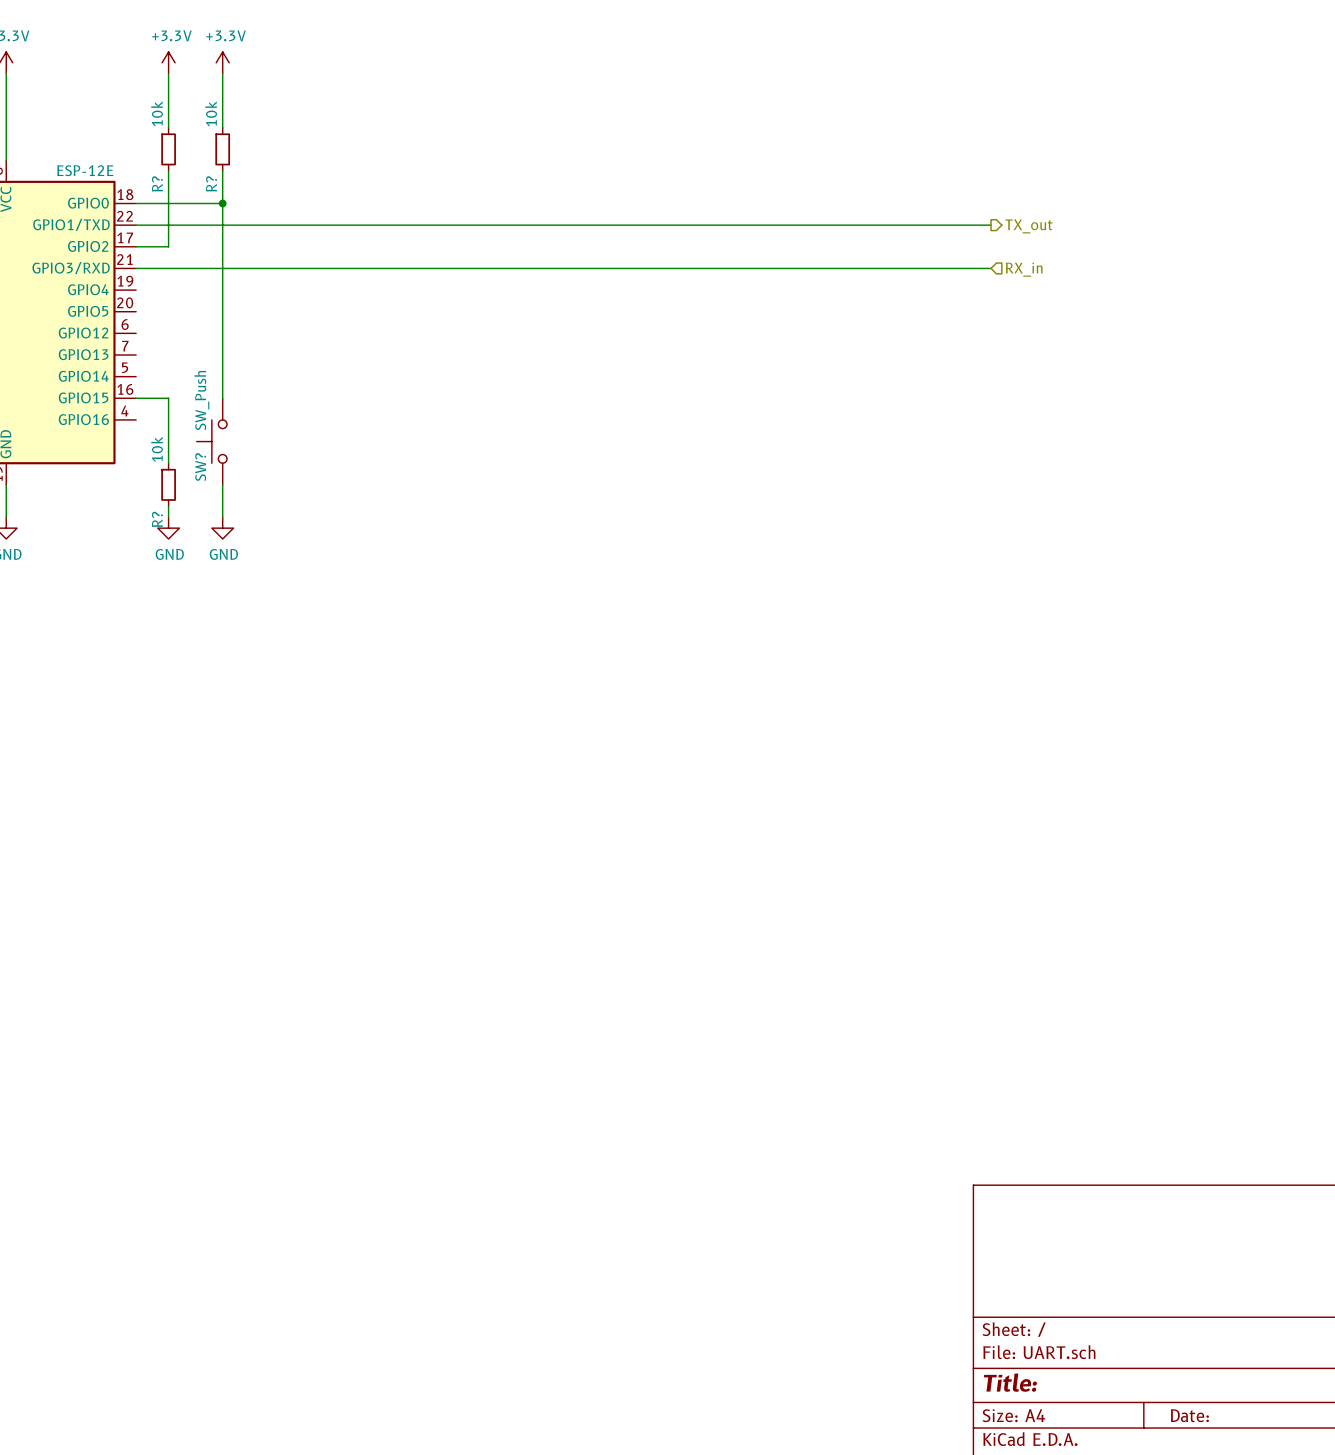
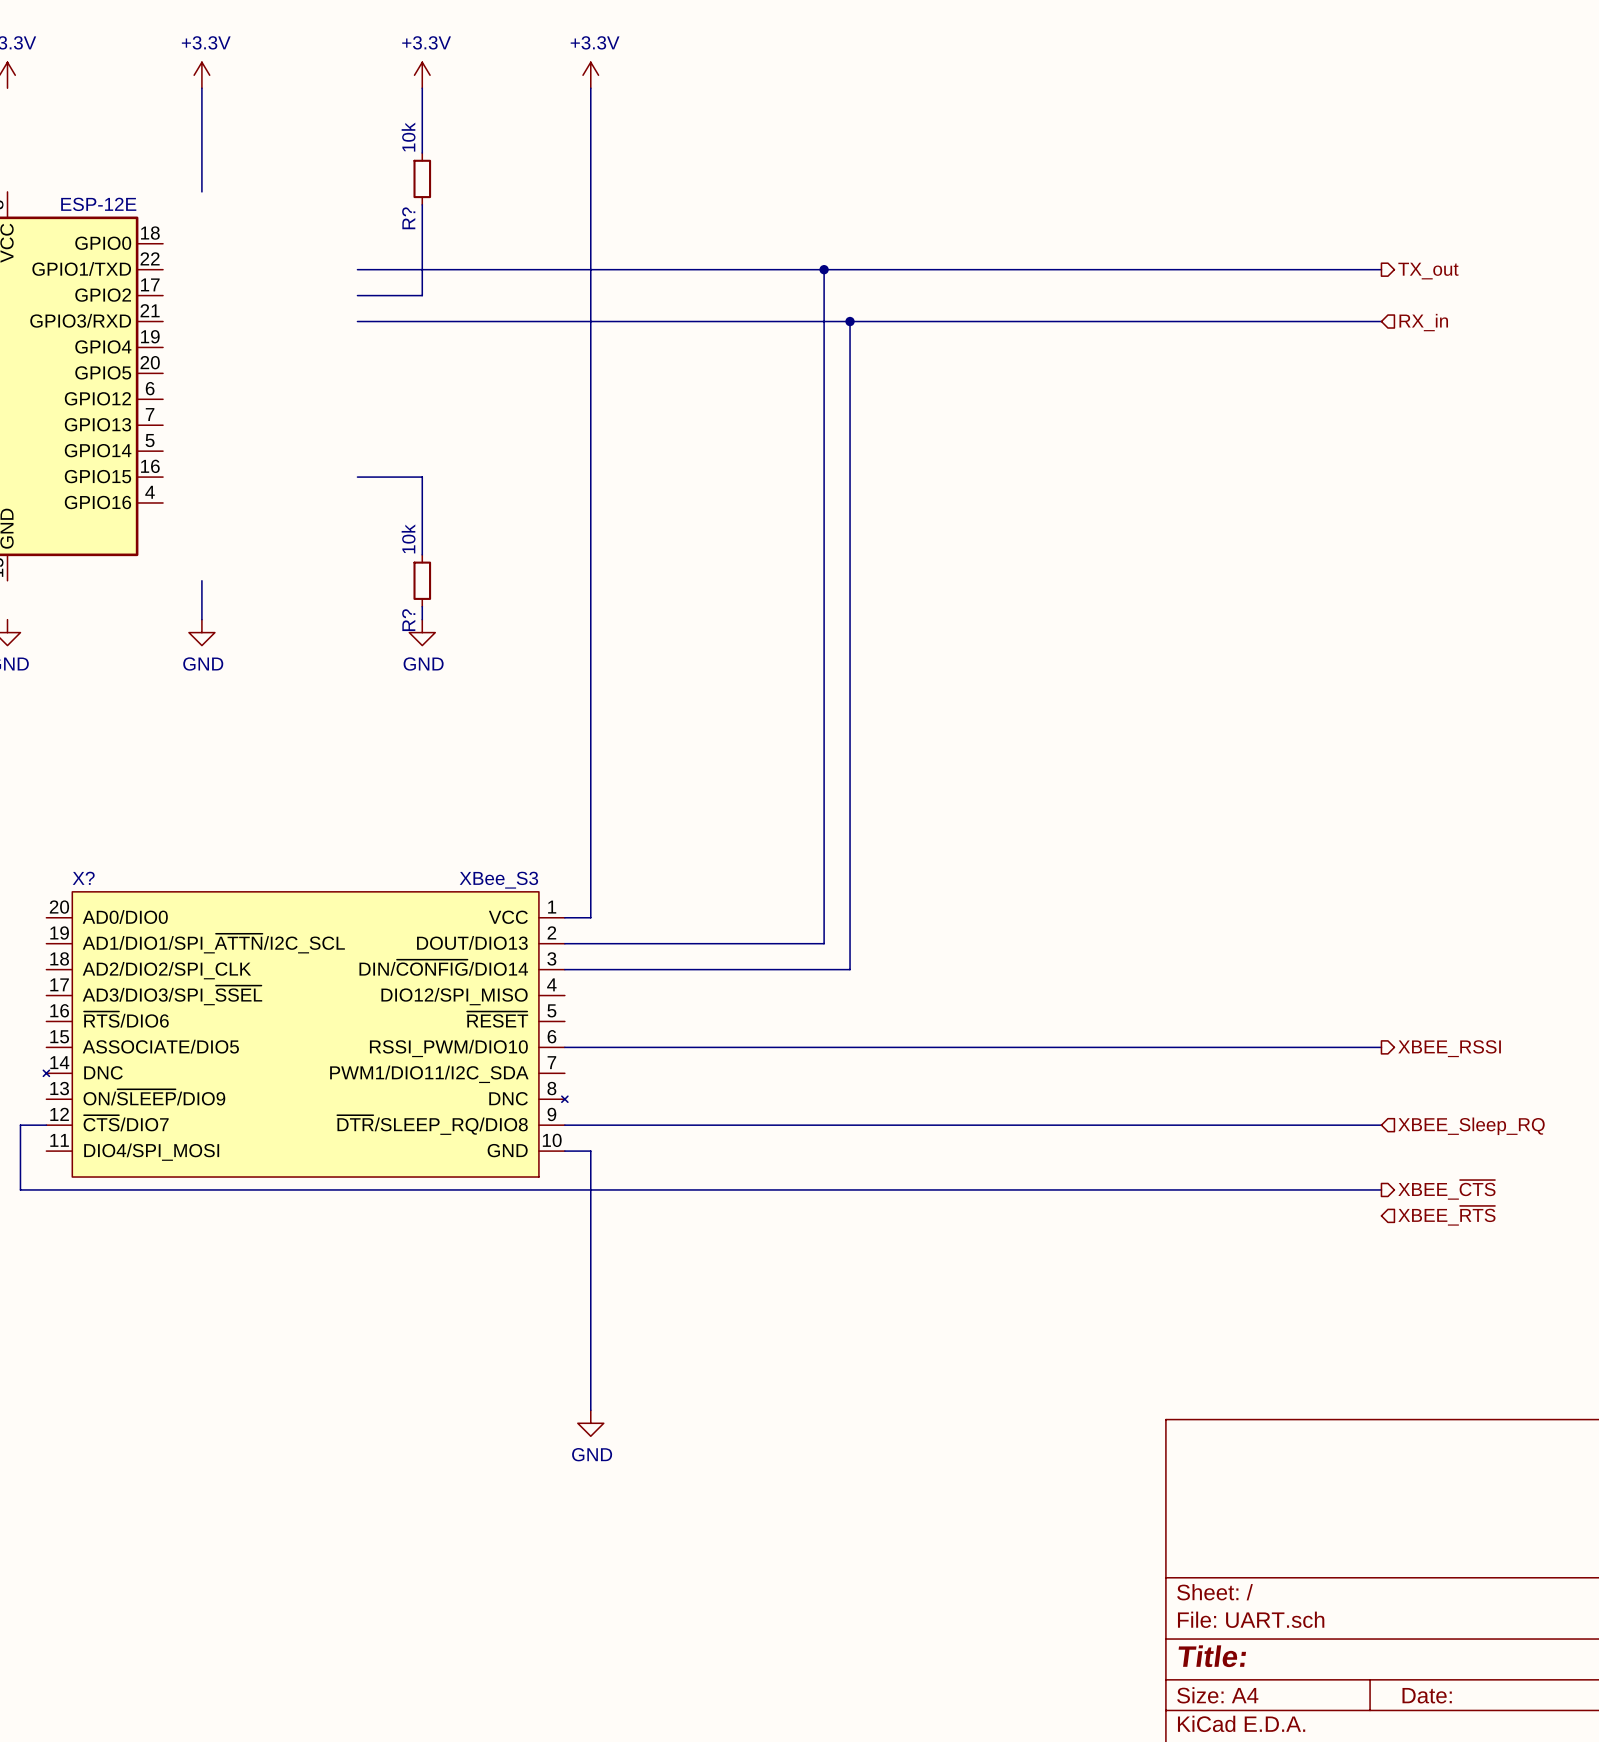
power symbol position: +3.3V (222, 62) -> +3.3V (422, 75)
power symbol: none -> +3.3V (590, 75)
wire: (6, 73) (6, 160) -> none
wire: (222, 73) (222, 127) -> (422, 88) (422, 153)
wire: none -> (590, 88) (590, 917) (564, 917)
wire: none -> (201, 153) (201, 191)
R?: 10k (168, 149) -> none
R?: 10k (222, 149) -> none
R?: none -> 10k (422, 178)
wire: (168, 171) (168, 246) (136, 246) -> none
wire: (222, 171) (222, 398) -> none
wire: none -> (422, 204) (422, 295) (357, 295)
wire: (136, 203) (222, 203) -> none
junction: (222, 203) -> none
wire: (136, 225) (298, 225) -> none
wire: none -> (824, 269) (824, 943) (564, 943)
junction: none -> (824, 269)
wire: none -> (1187, 269) (1381, 269)
hierarchical label position: TX_out (1028, 226) -> TX_out (1428, 271)
wire: (136, 268) (298, 268) -> none
wire: none -> (850, 321) (850, 969) (564, 969)
junction: none -> (850, 321)
wire: none -> (1187, 321) (1381, 321)
hierarchical label position: RX_in (1024, 269) -> RX_in (1423, 322)
wire: (136, 398) (168, 398) (168, 463) -> none
wire: none -> (357, 477) (422, 477) (422, 554)
SW?: SW_Push (211, 441) -> none
wire: (6, 484) (6, 517) -> none
wire: none -> (201, 580) (201, 606)
R?: 10k (168, 484) -> none
wire: (222, 484) (222, 517) -> none
R?: none -> 10k (422, 580)
wire: none -> (422, 606) (422, 619)
power symbol position: GND (222, 528) -> GND (422, 632)
X?: none -> XBee_S3 (305, 1034)
wire: none -> (564, 1047) (1381, 1047)
hierarchical label: none -> XBEE_RSSI (1449, 1048)
wire: none -> (46, 1125) (20, 1125) (20, 1189) (1381, 1189)
wire: none -> (564, 1125) (1381, 1125)
hierarchical label: none -> XBEE_Sleep_RQ (1471, 1126)
wire: none -> (564, 1151) (590, 1151) (590, 1410)
hierarchical label: none -> XBEE_~{CTS} (1446, 1189)
hierarchical label: none -> XBEE_~{RTS} (1446, 1215)
power symbol: none -> GND (590, 1423)

